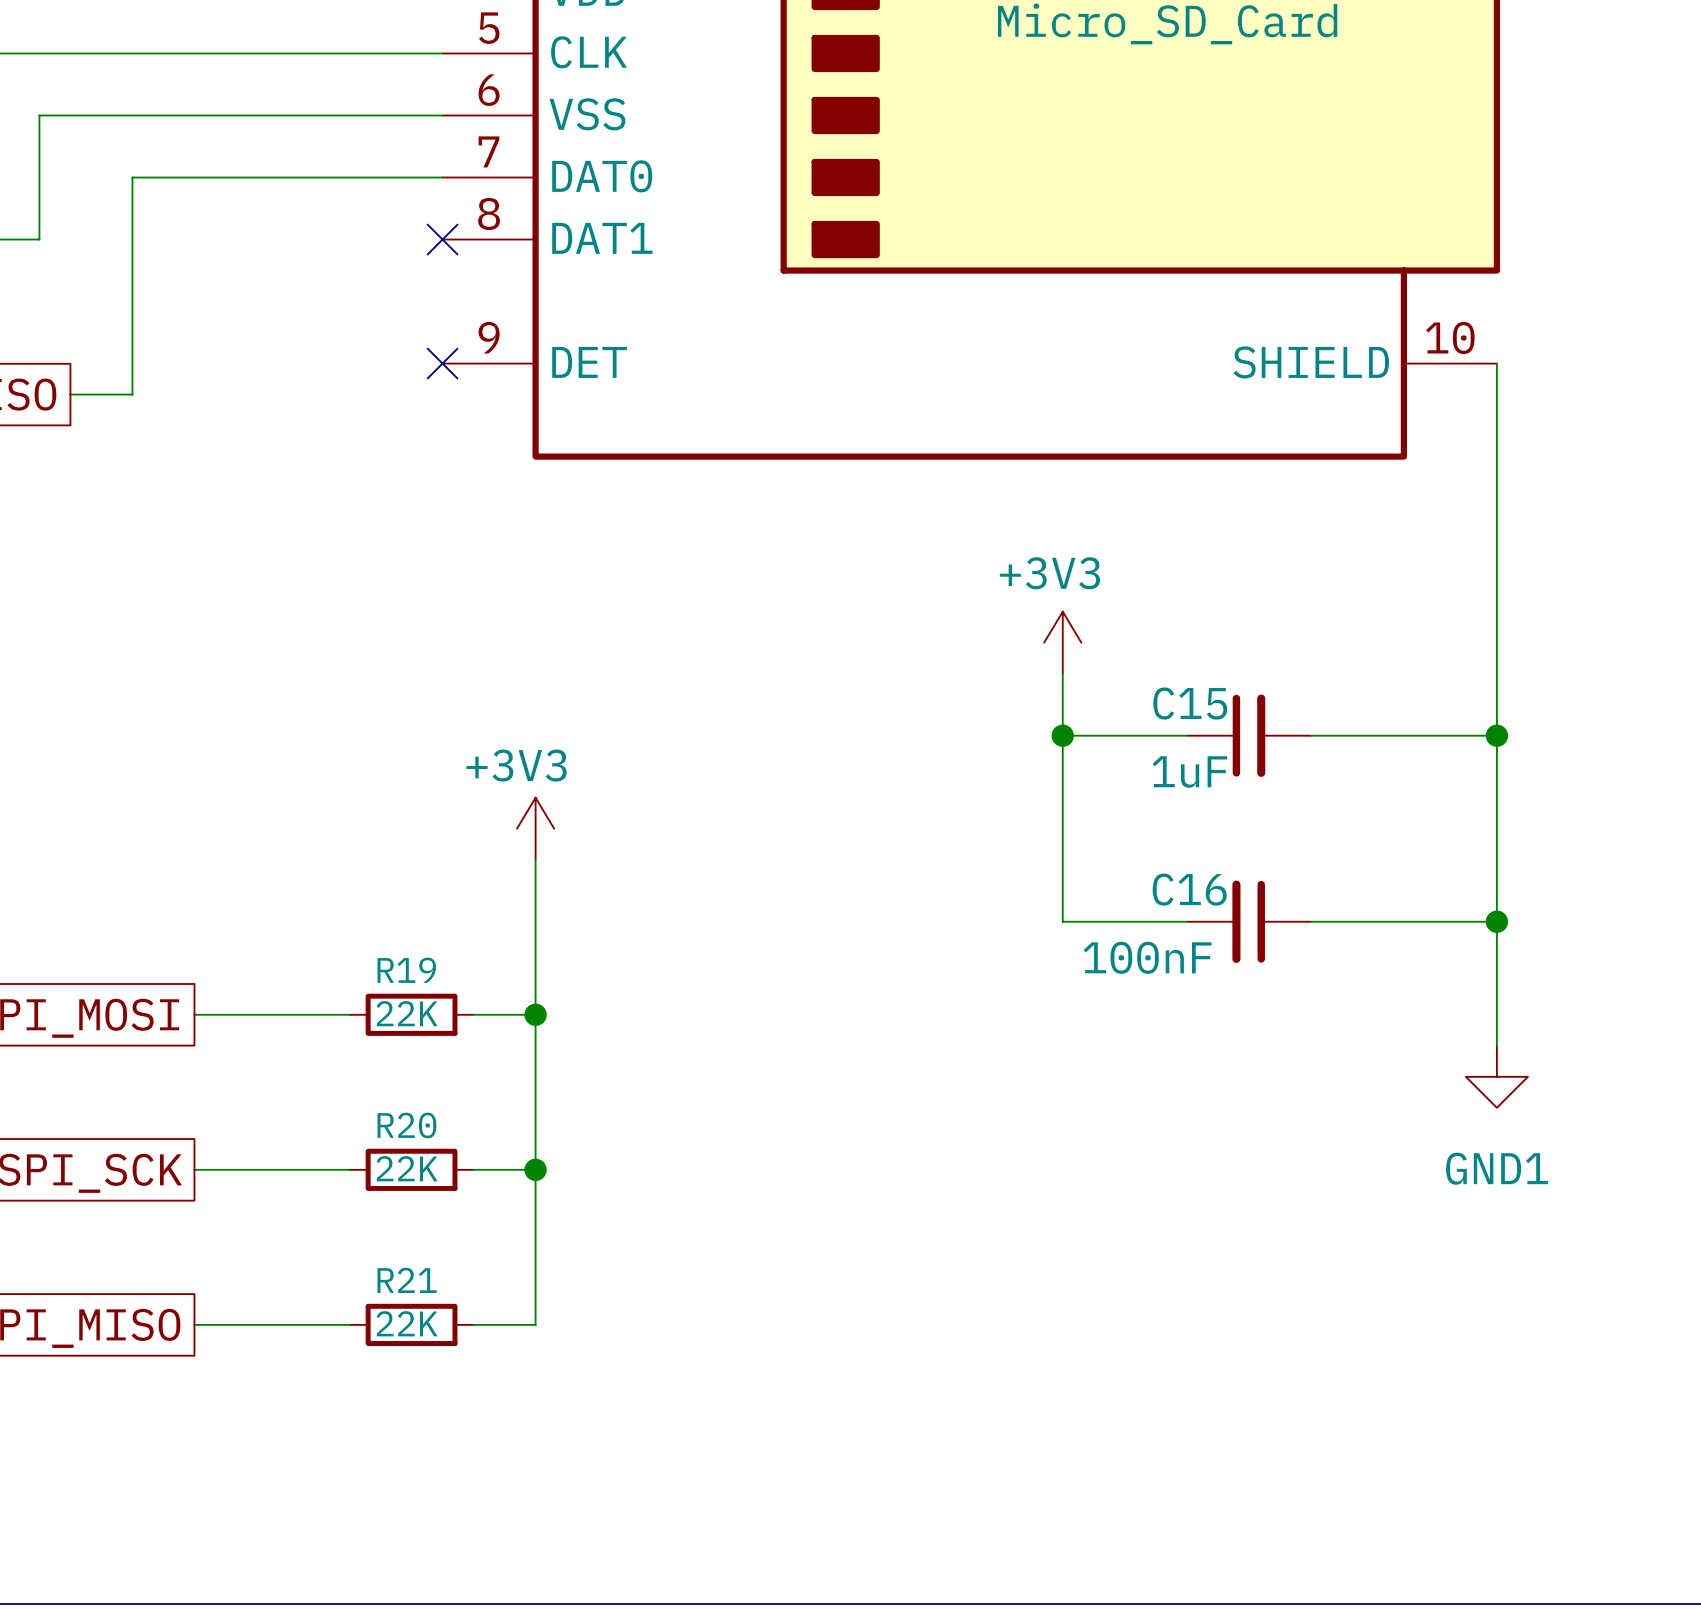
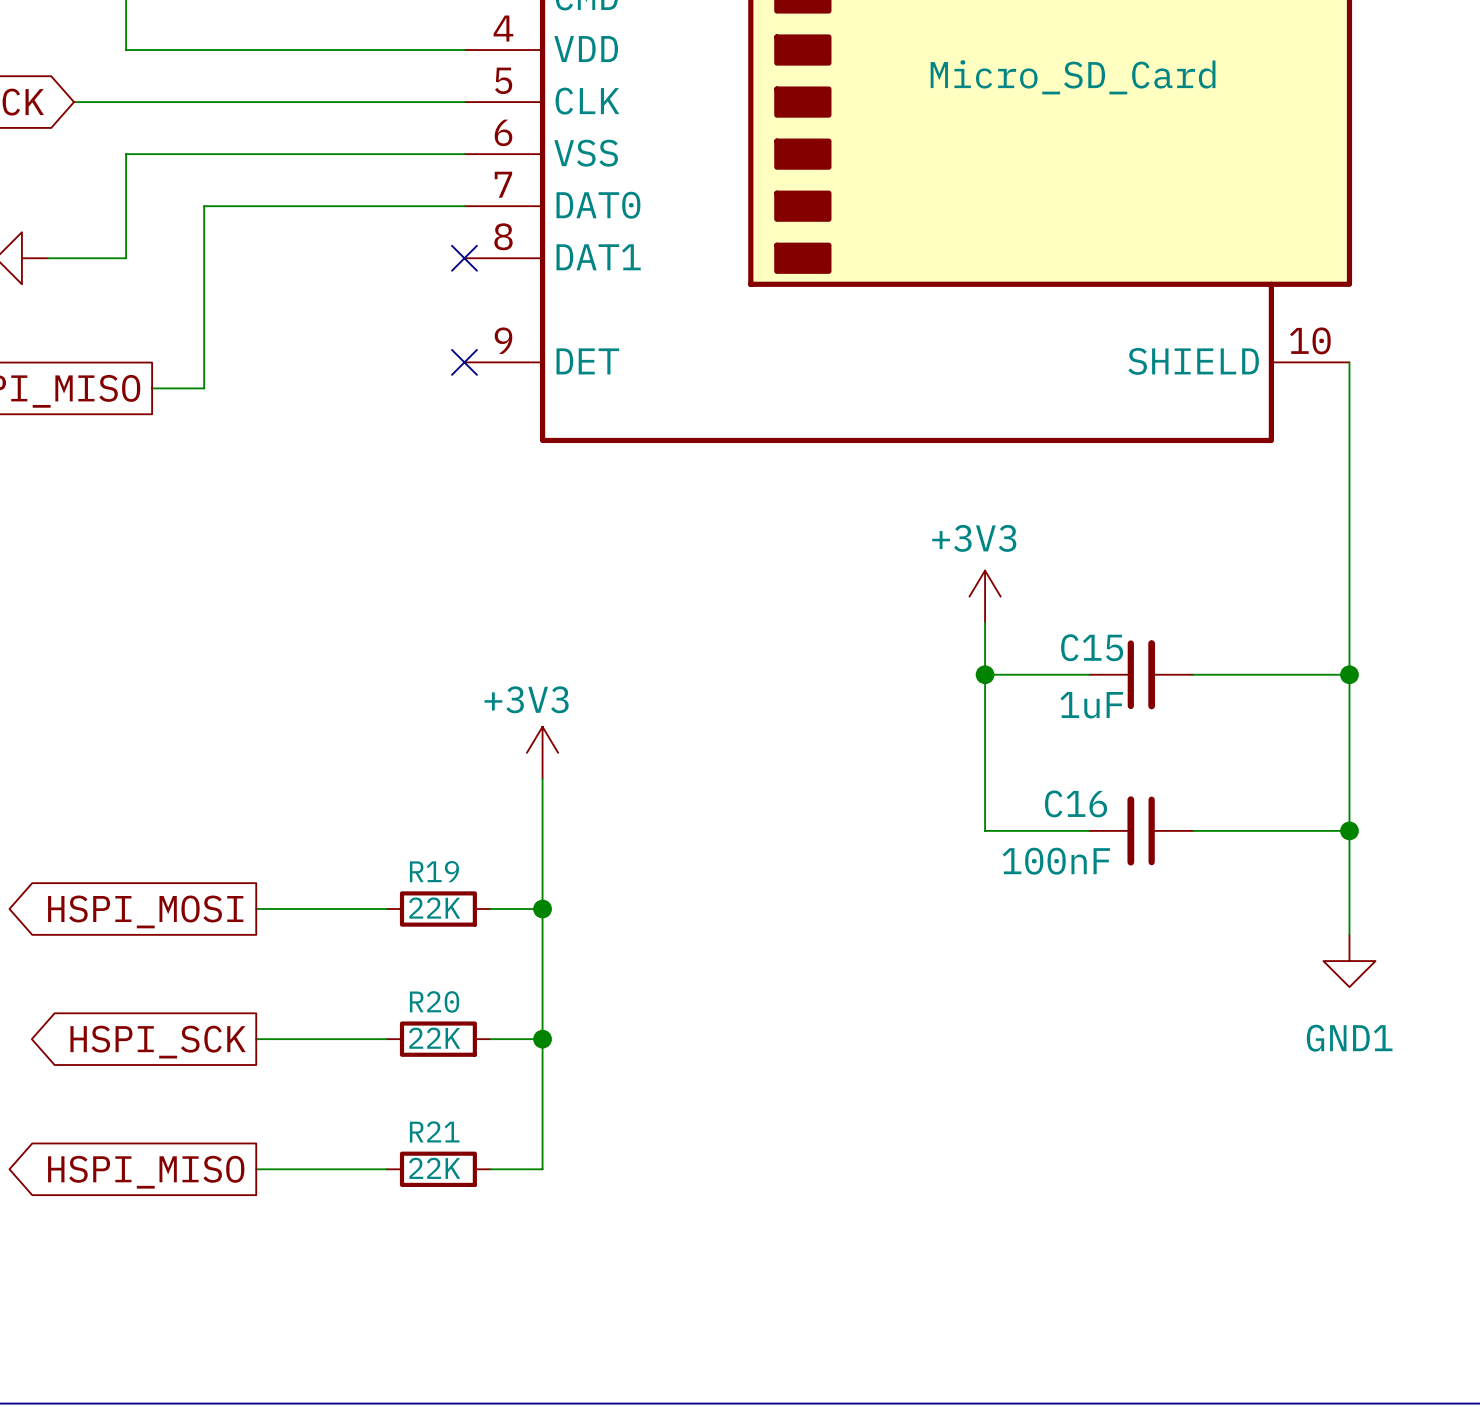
C16 name position: C16 (1189, 889) -> C16 (1076, 803)

